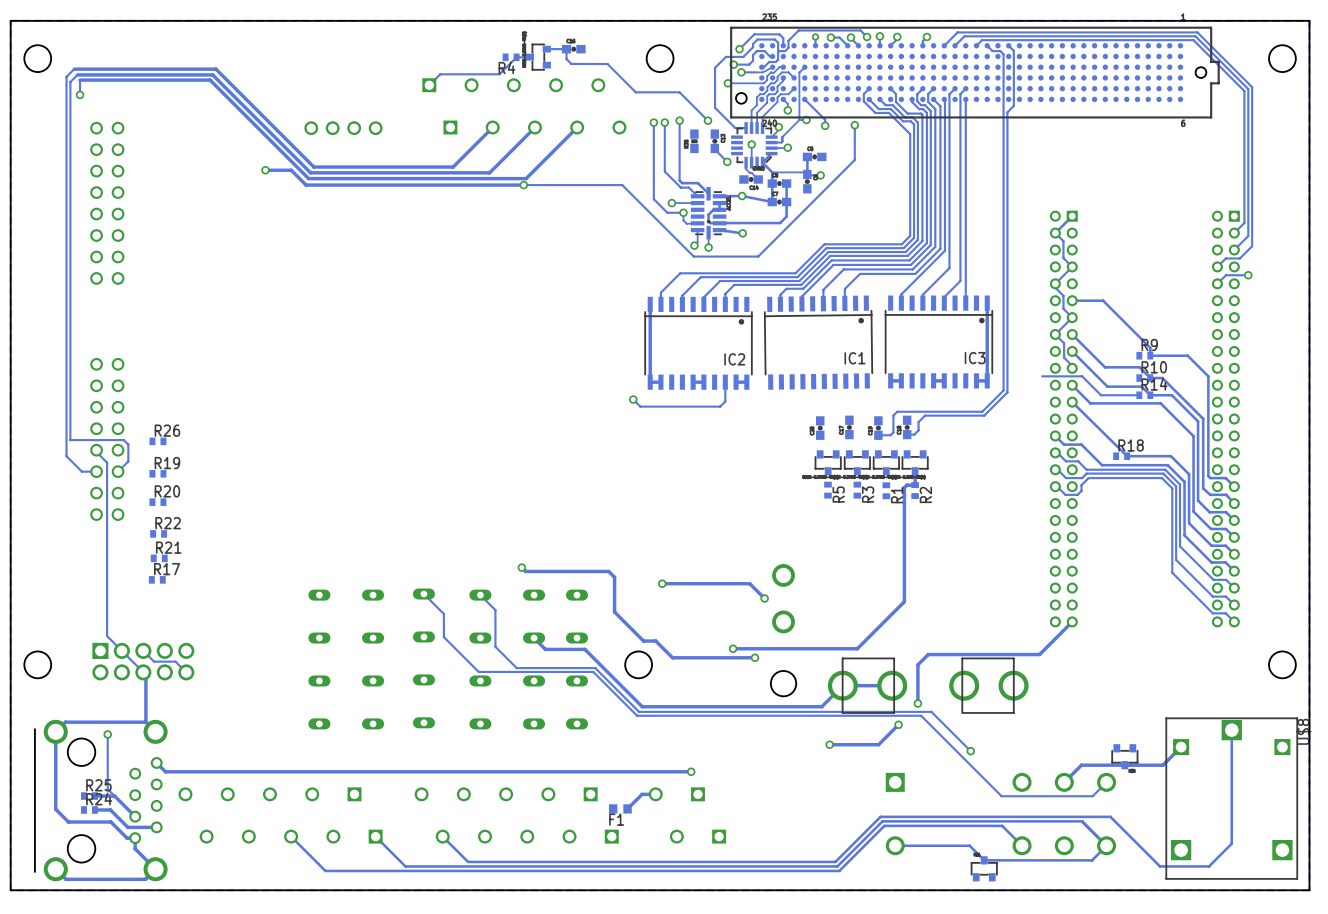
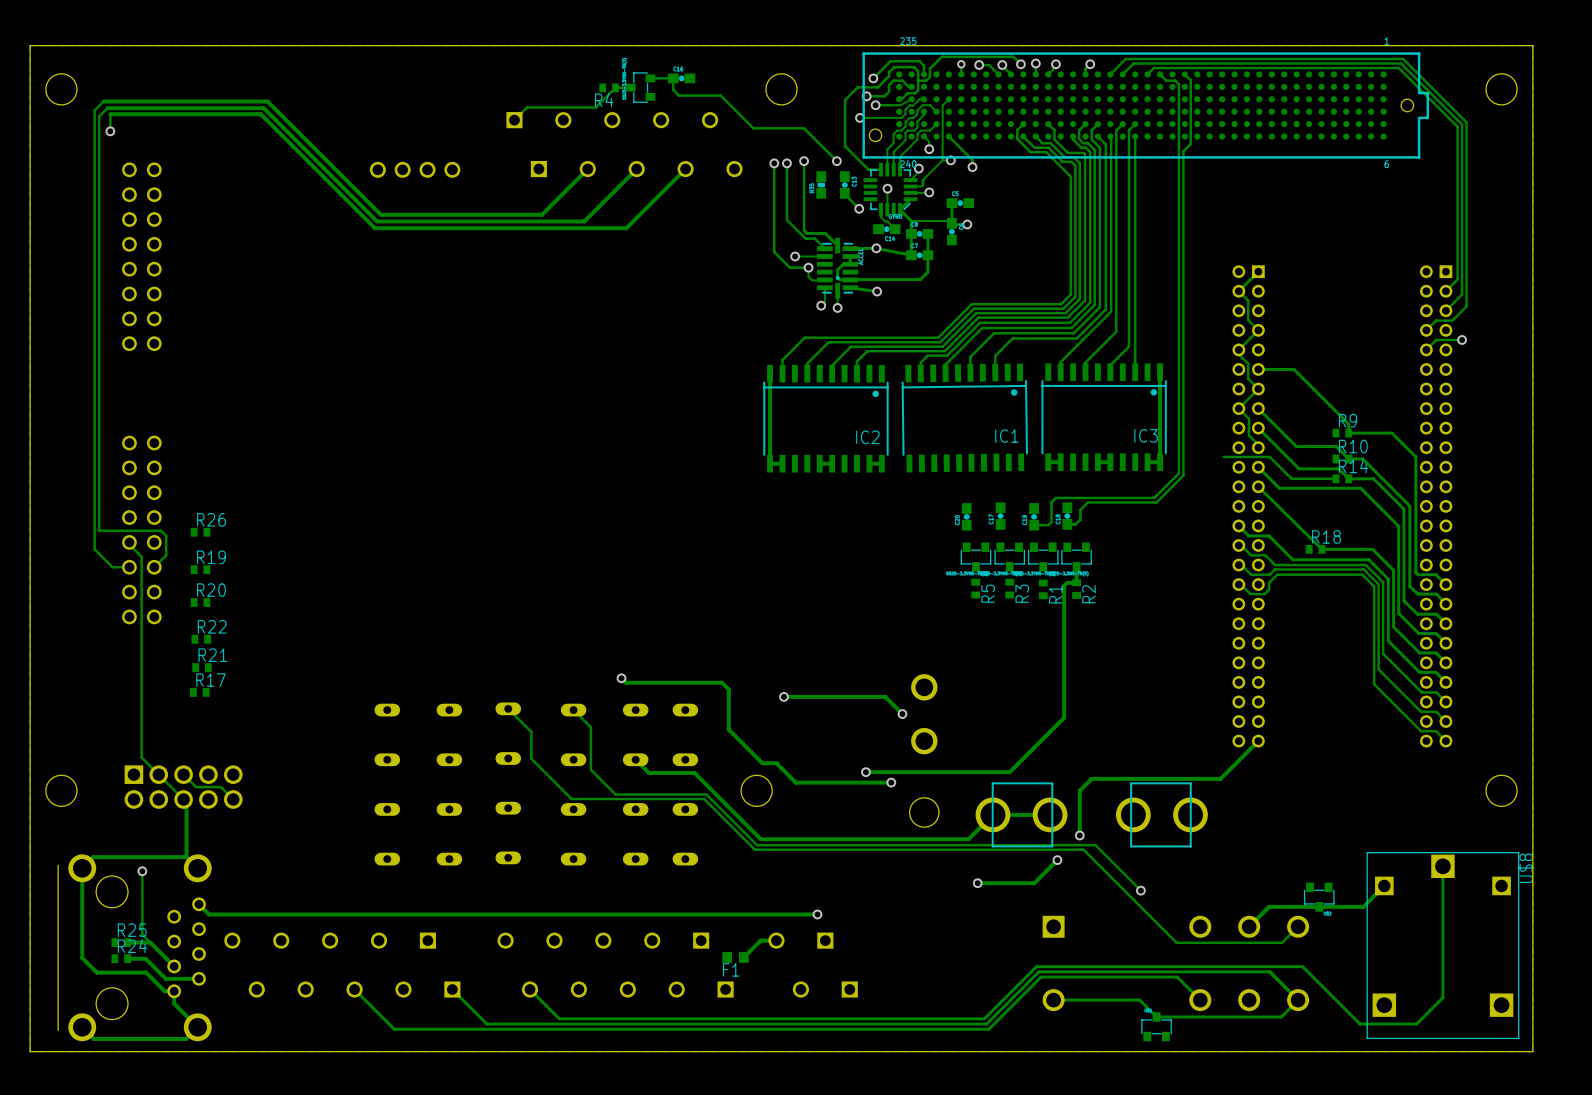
track: (854, 125) (854, 159) (758, 256) (693, 256) (622, 185) (306, 185) (291, 170) (265, 170) -> none
via: (854, 125) -> none
via: (265, 170) -> none
via: (523, 185) -> none
track: (725, 382) (725, 401) (720, 406) (640, 406) (633, 399) -> none
via: (633, 399) -> none

